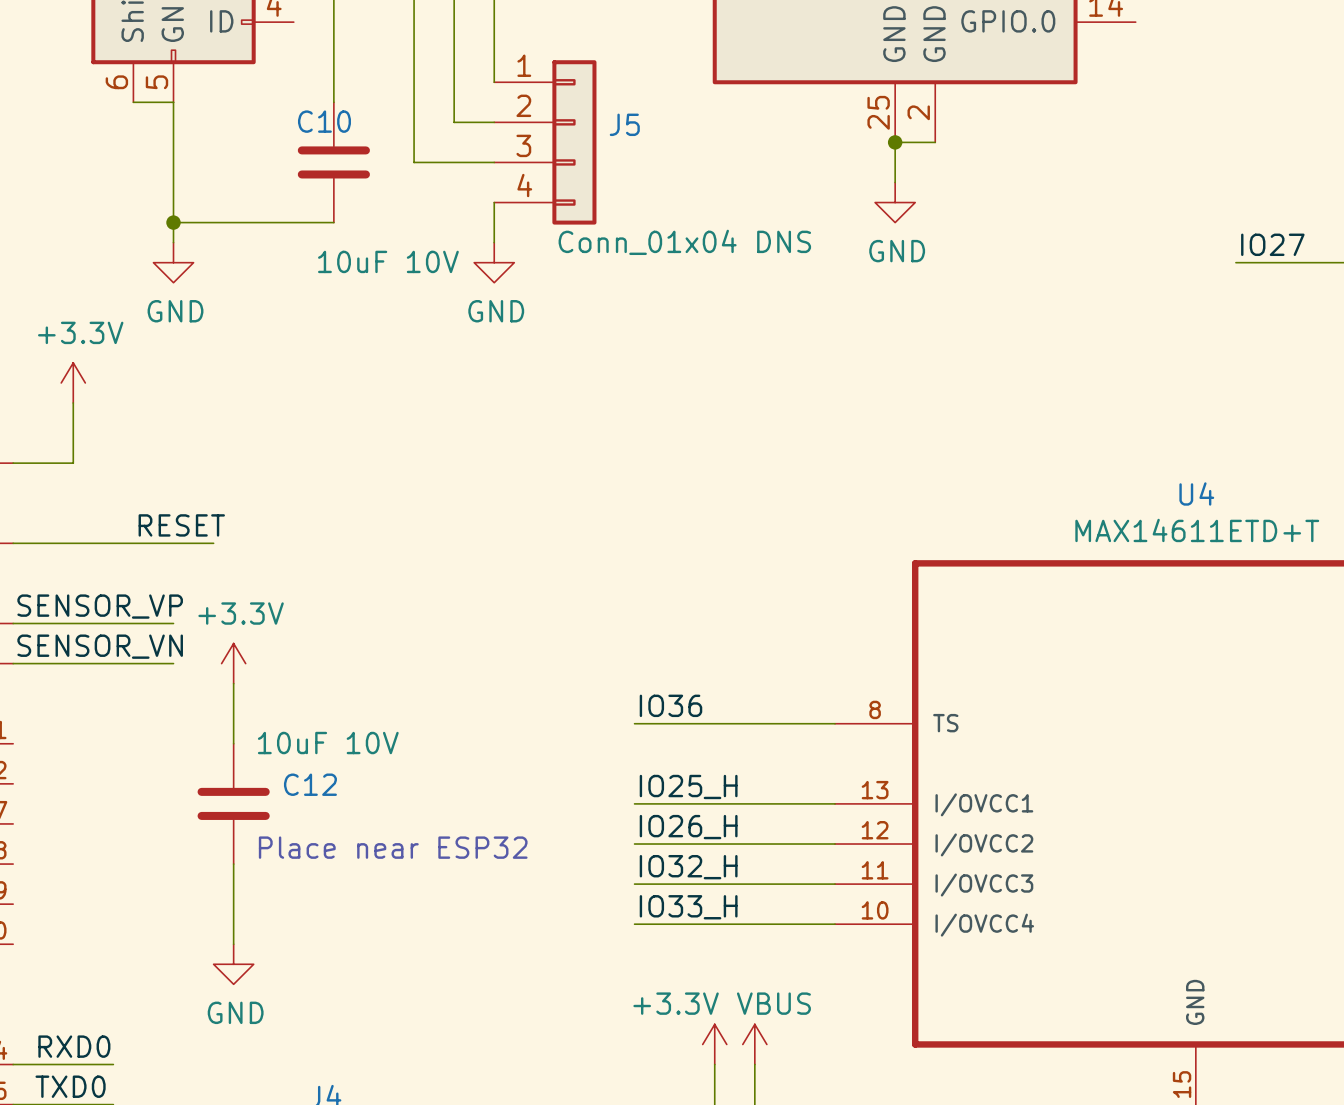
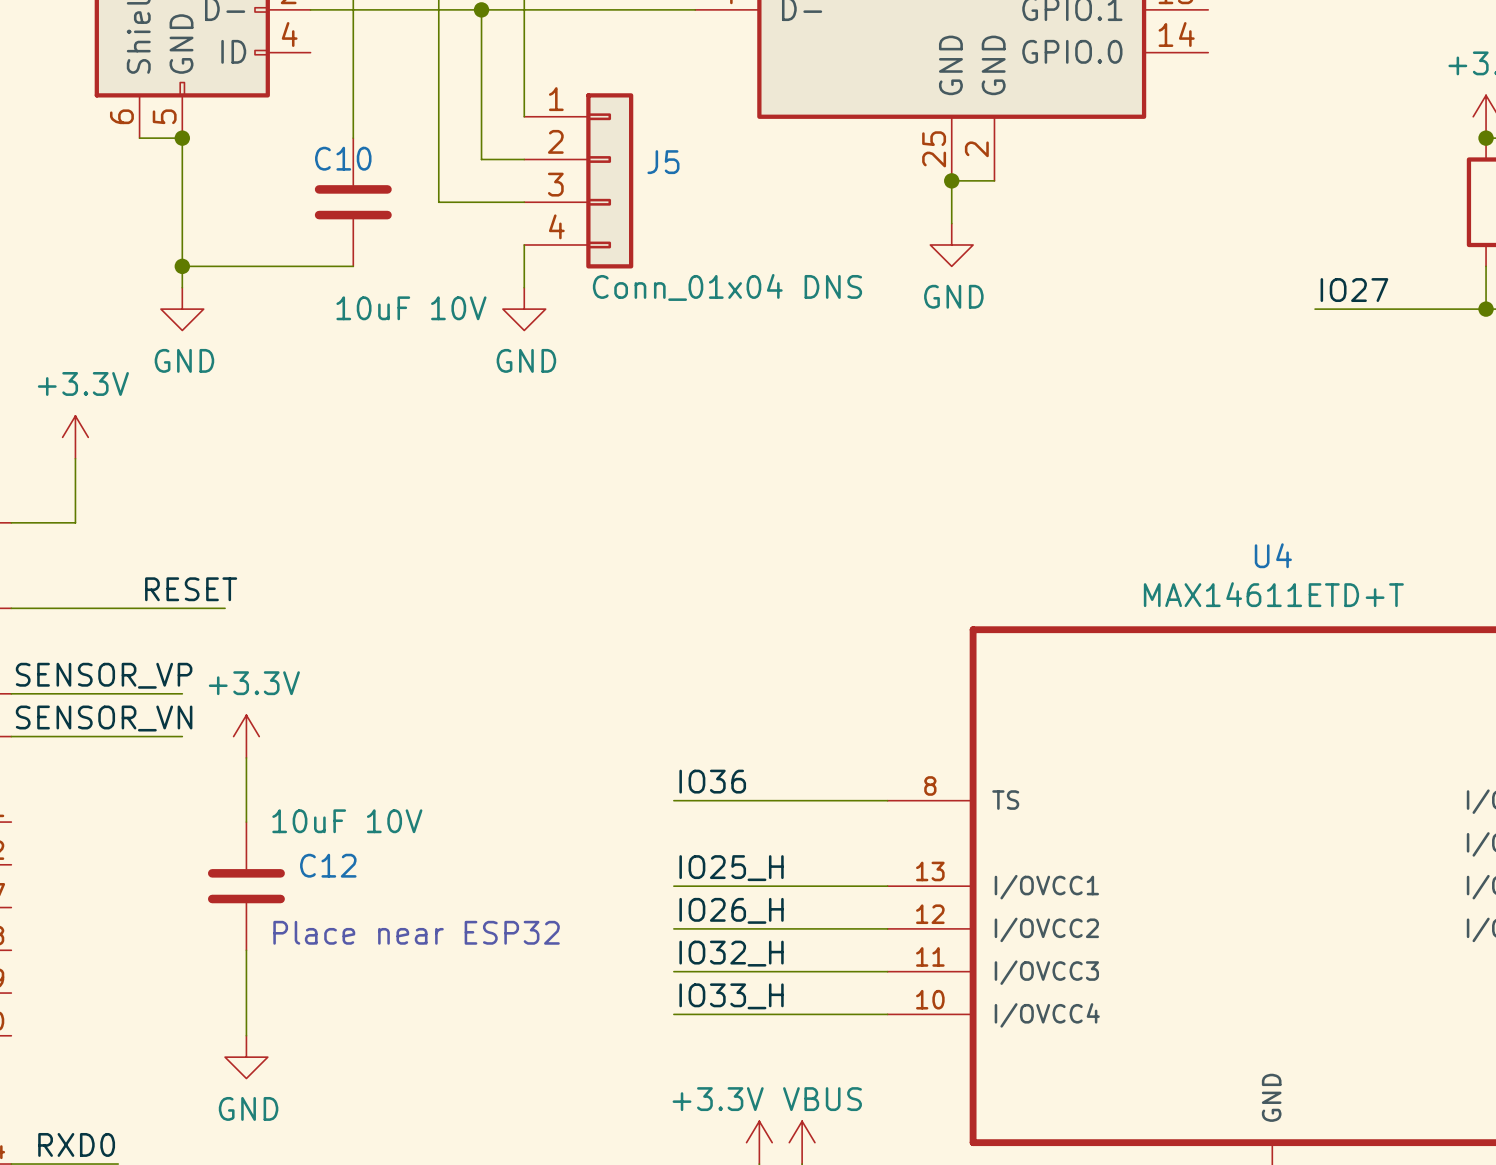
junction: none -> (182, 138)

